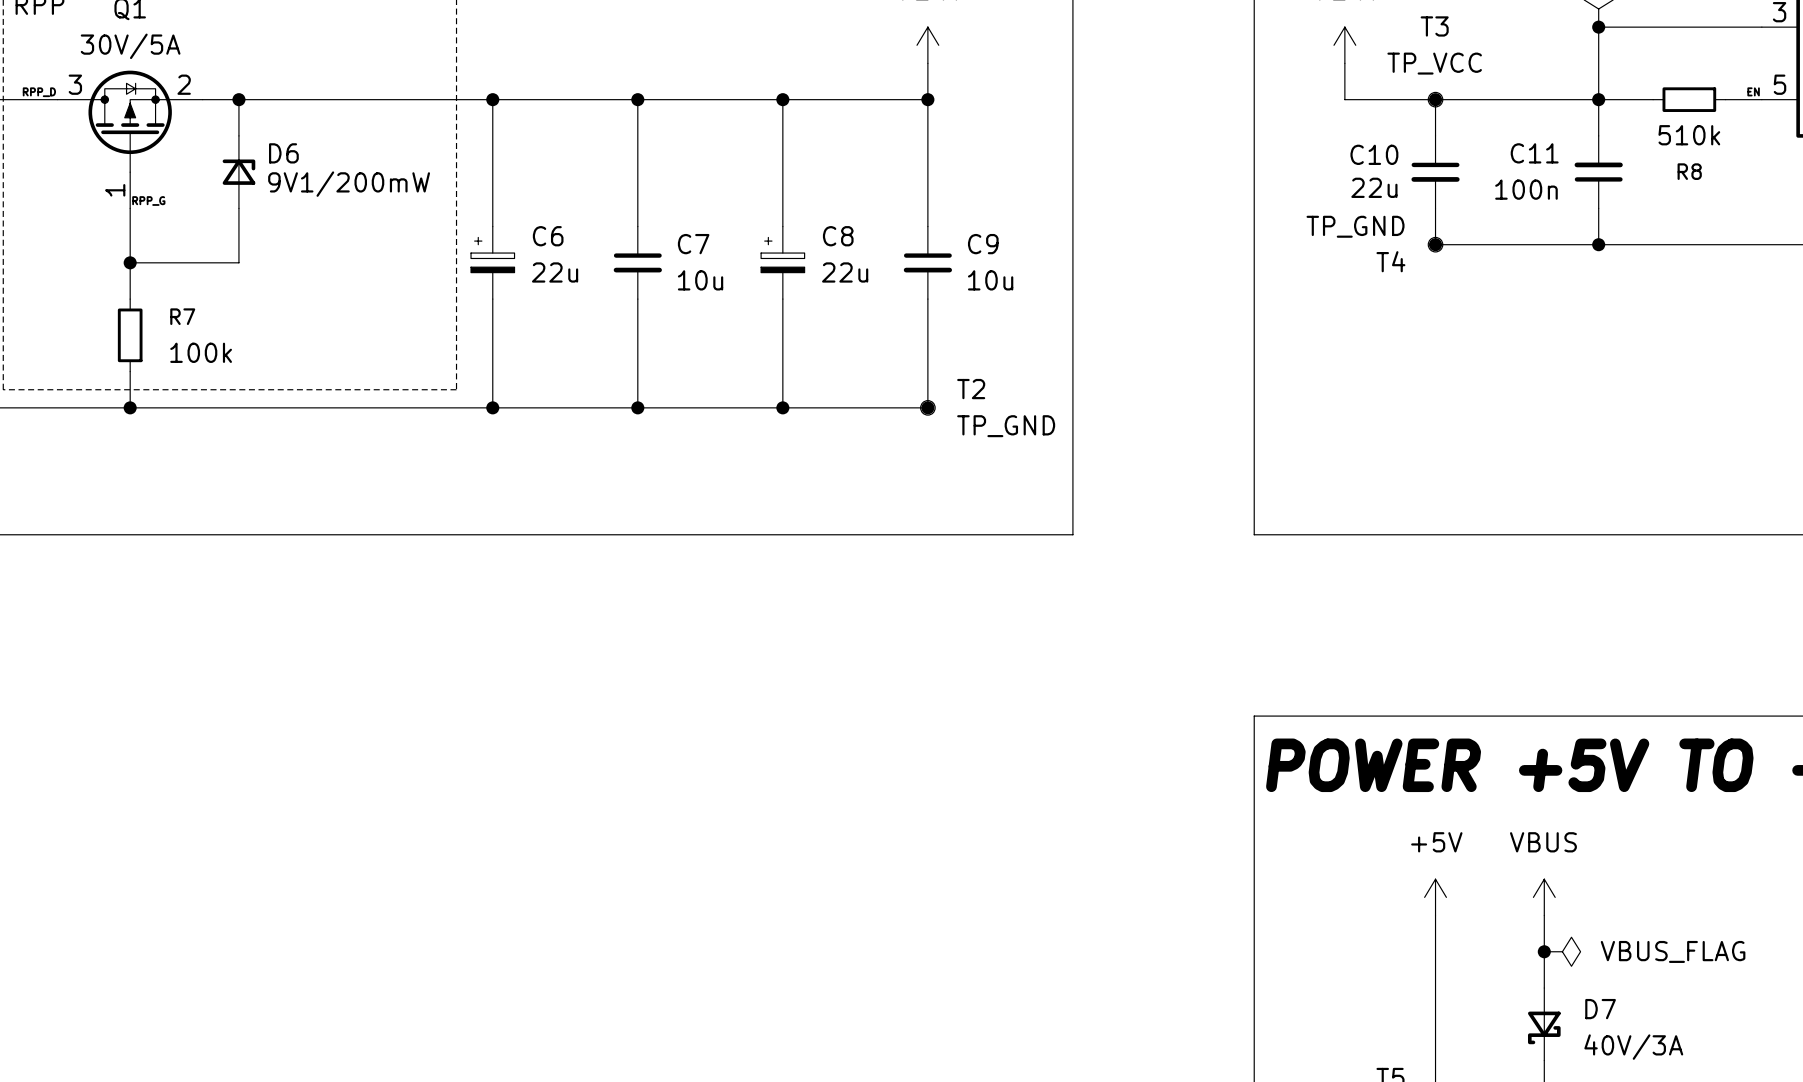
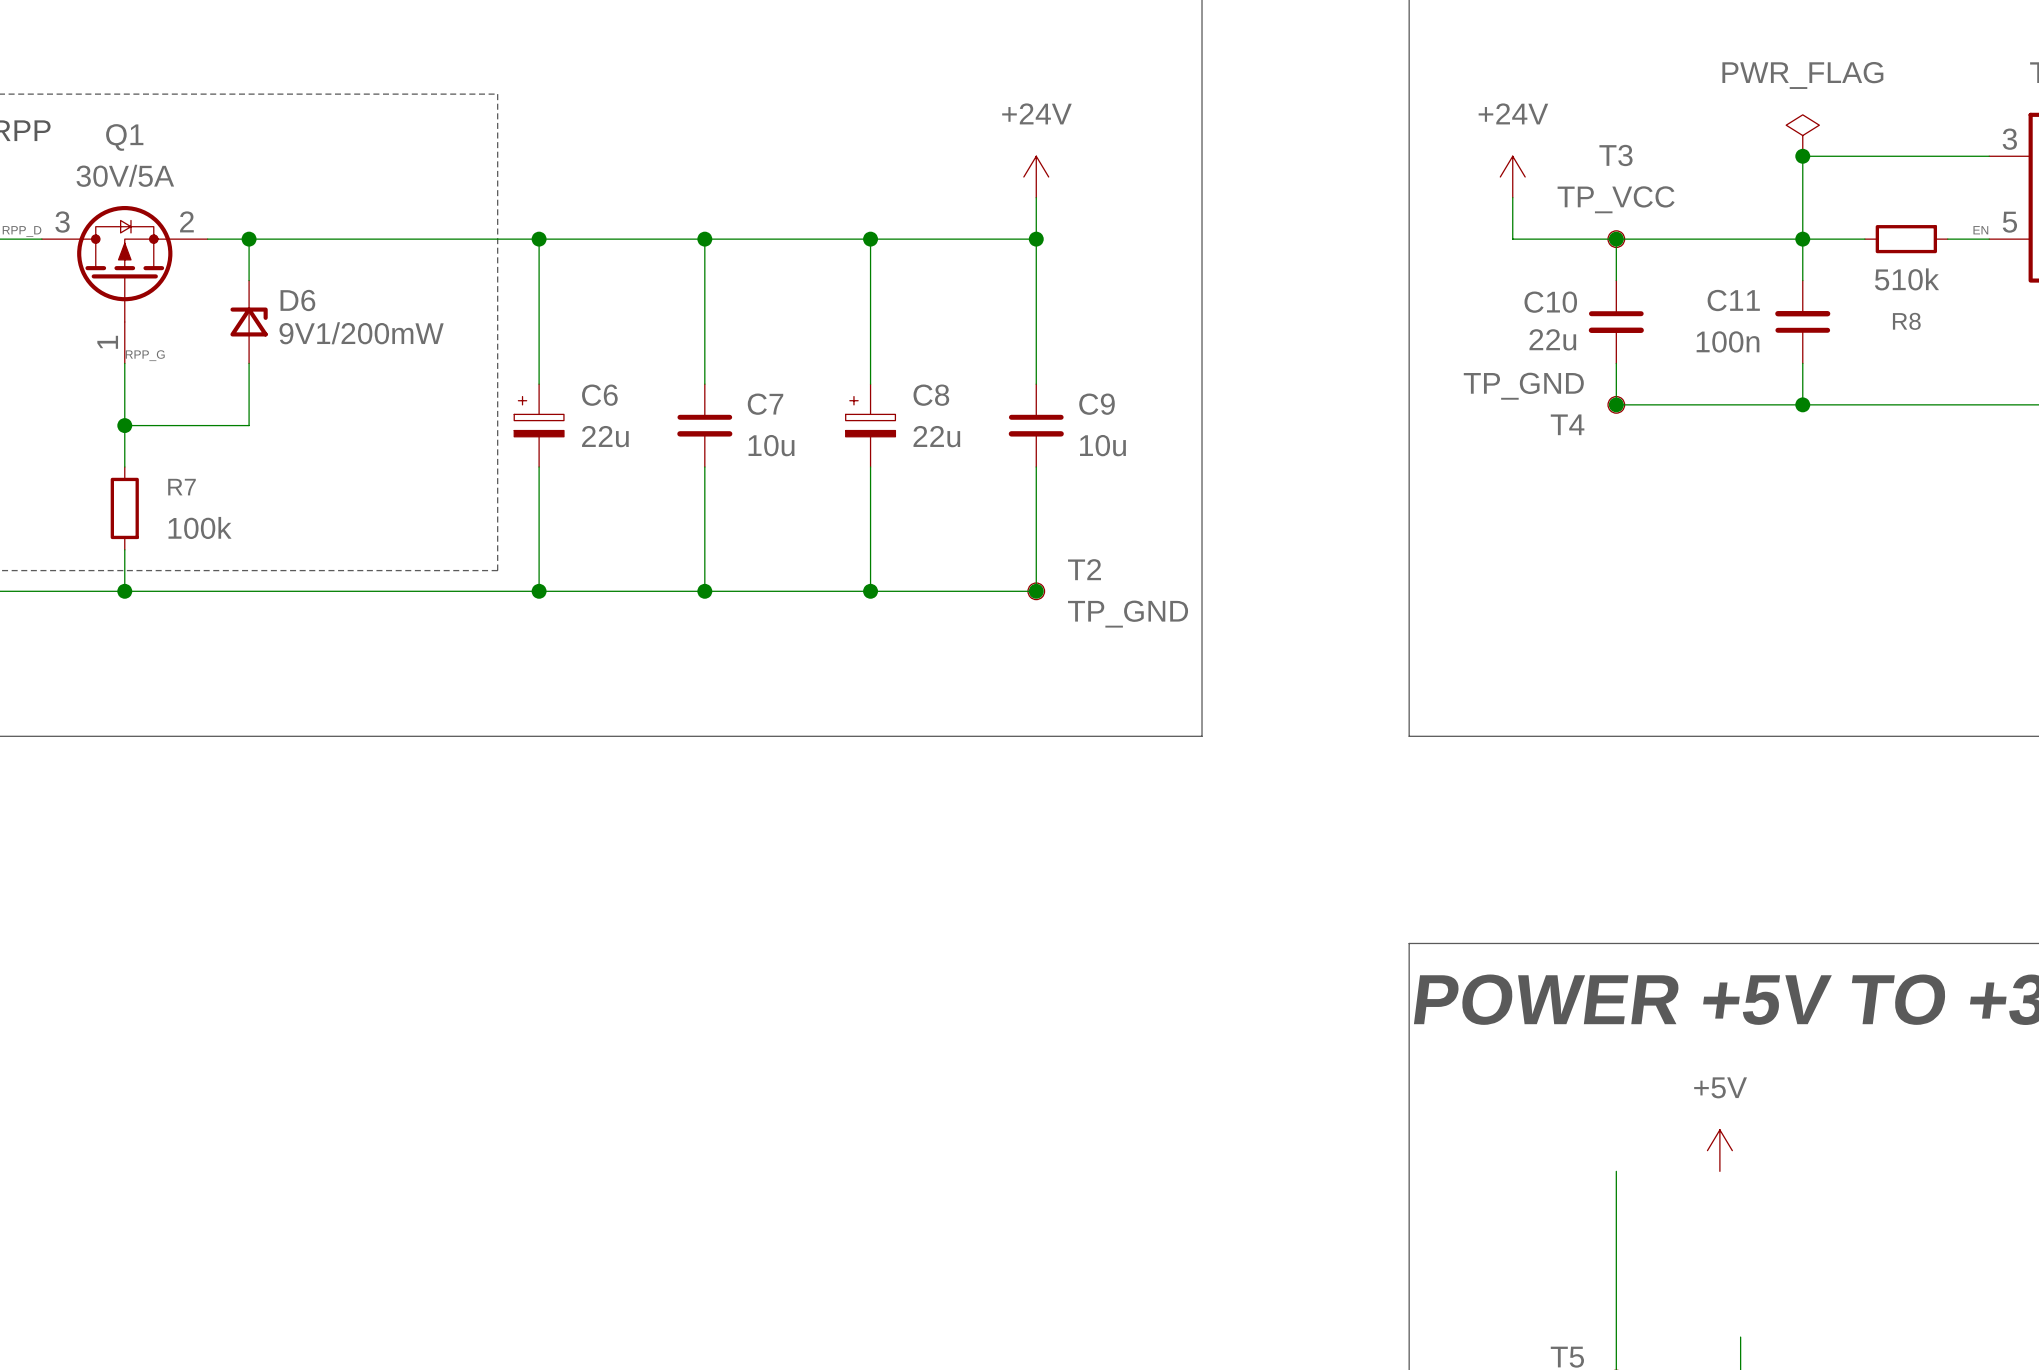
power symbol position: +5V (1435, 897) -> +5V (1719, 1150)
power symbol: VBUS (1544, 897) -> none
wire: (1544, 915) (1544, 988) -> none
junction: (1544, 951) -> none
power symbol: VBUS_FLAG (1562, 951) -> none
D7: 40V/3A (1544, 1024) -> none

